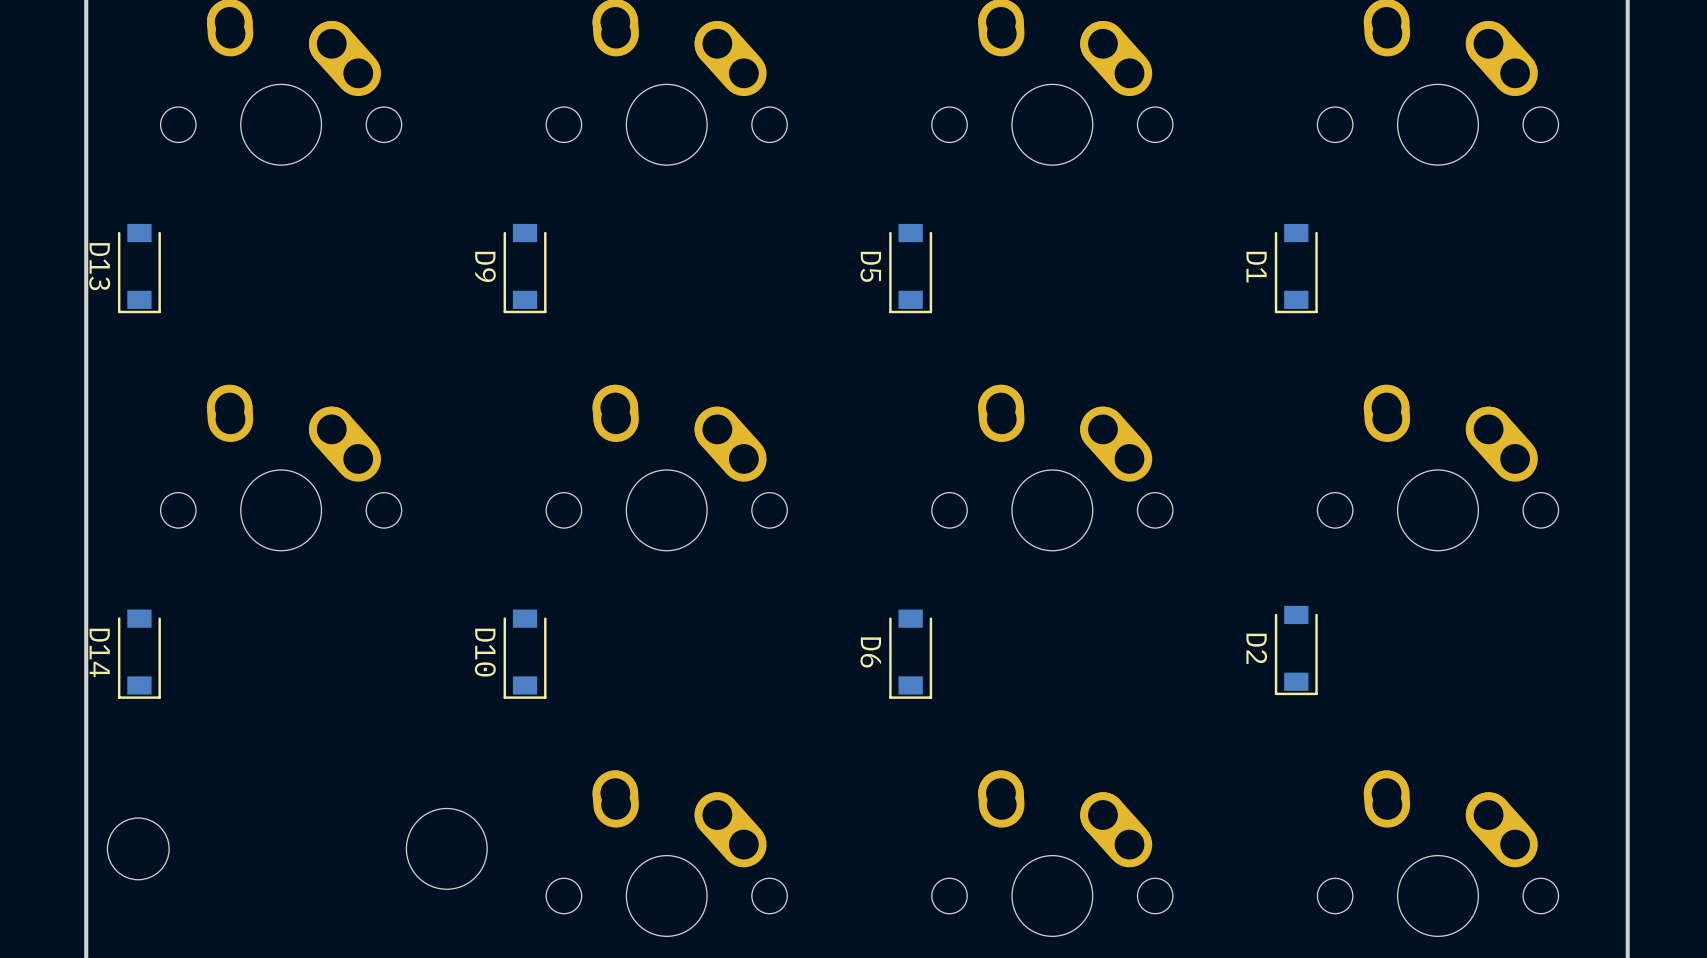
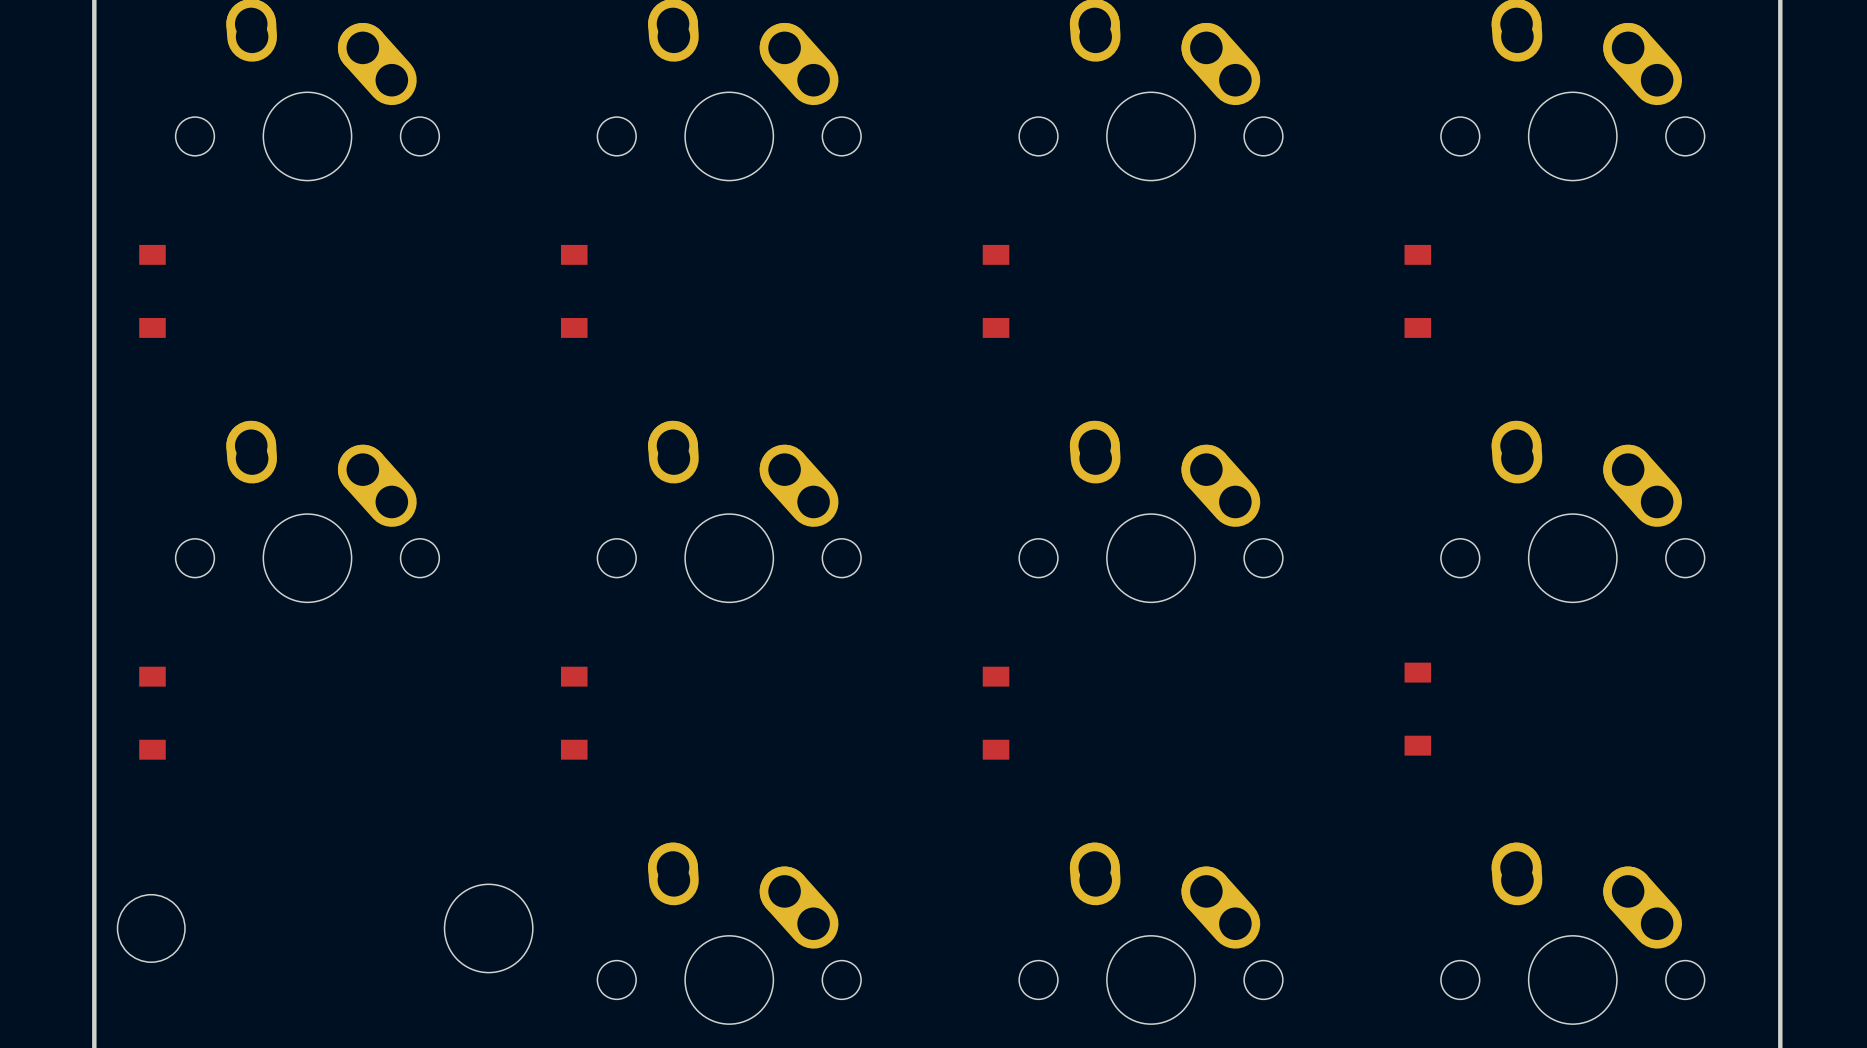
D13 side: bottom (139, 268) -> top (152, 291)
D9 side: bottom (525, 268) -> top (574, 291)
D5 side: bottom (910, 268) -> top (996, 291)
D1 side: bottom (1296, 268) -> top (1417, 291)
D2 side: bottom (1296, 650) -> top (1417, 709)
D14 side: bottom (139, 654) -> top (152, 713)
D10 side: bottom (525, 654) -> top (574, 713)
D6 side: bottom (910, 654) -> top (996, 713)

